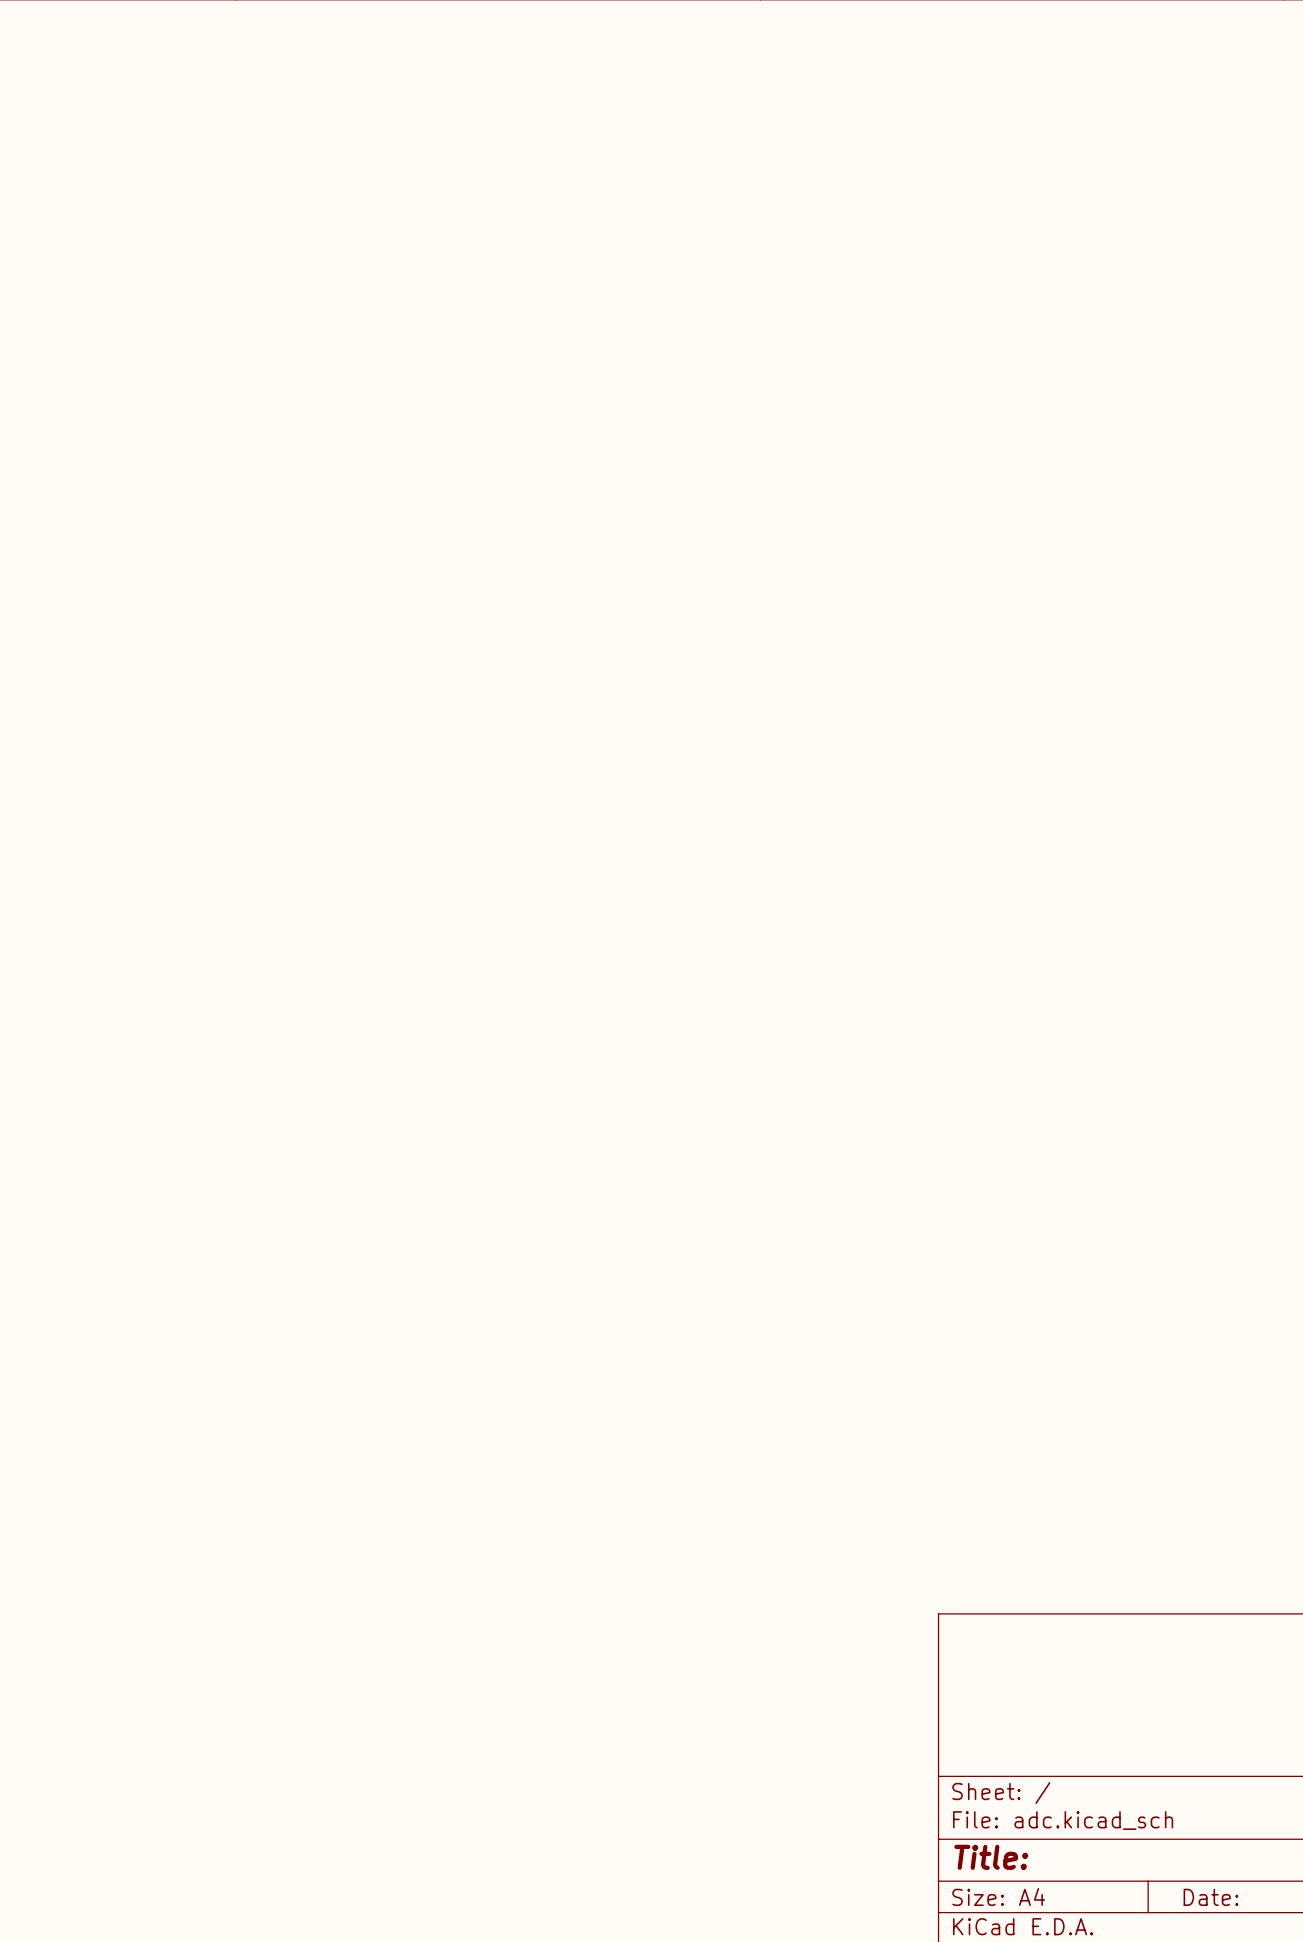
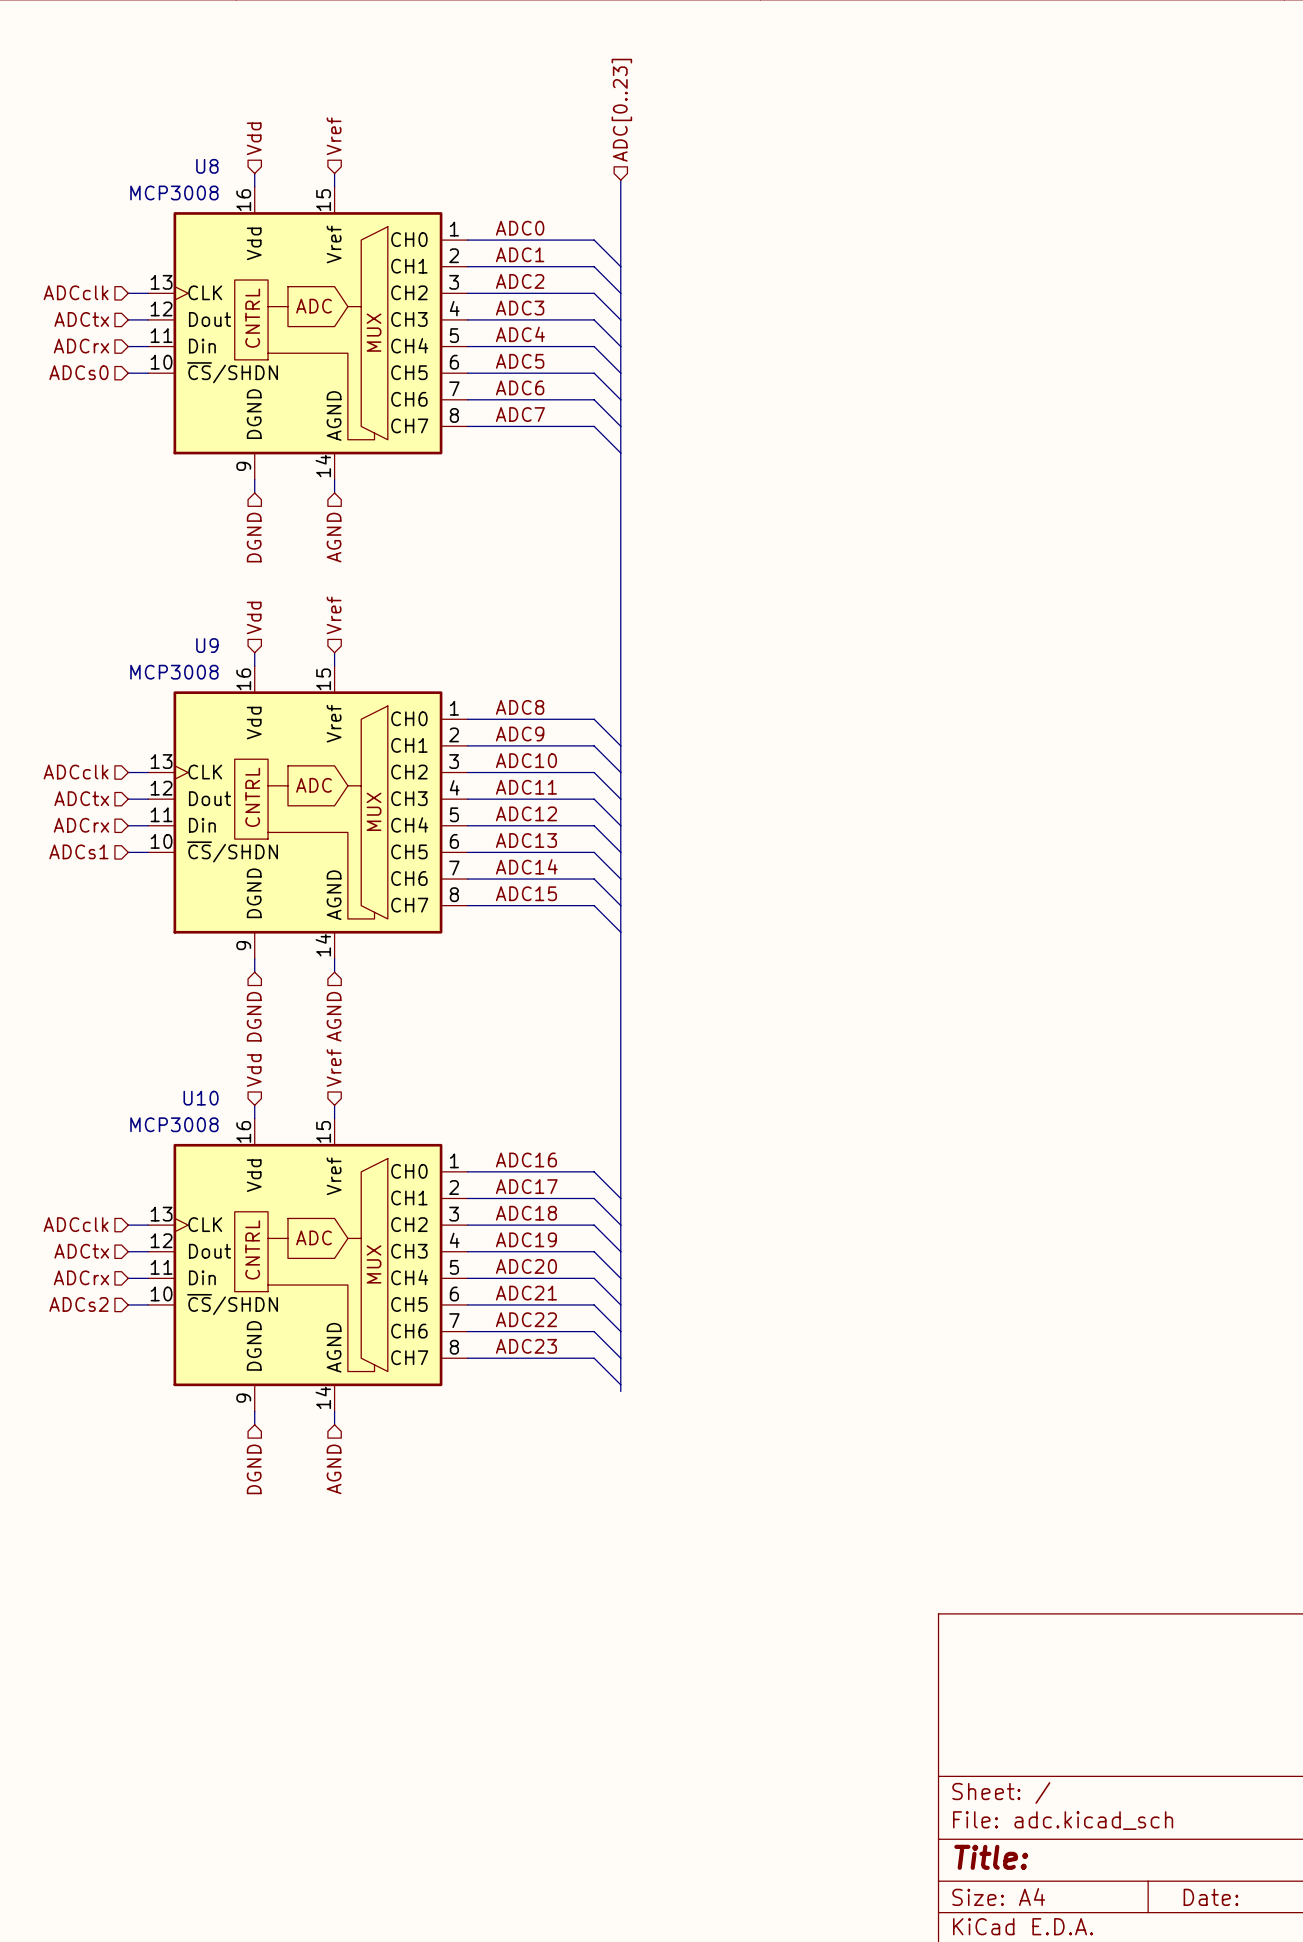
hierarchical label: none -> ADC[0..23] (621, 110)
hierarchical label: none -> Vref (334, 136)
hierarchical label: none -> Vdd (254, 138)
wire: none -> (254, 173) (254, 186)
wire: none -> (334, 173) (334, 186)
bus: none -> (620, 180) (620, 1391)
label: none -> ADC0 (520, 228)
wire: none -> (467, 240) (594, 240) (620, 266)
label: none -> ADC1 (520, 254)
wire: none -> (467, 266) (594, 266) (620, 293)
label: none -> ADC2 (520, 281)
hierarchical label: none -> ADCclk (76, 292)
wire: none -> (128, 293) (148, 293)
wire: none -> (467, 293) (594, 293) (620, 319)
label: none -> ADC3 (520, 308)
hierarchical label: none -> ADCtx (81, 319)
wire: none -> (128, 319) (148, 319)
wire: none -> (467, 319) (594, 319) (620, 346)
U8: none -> MCP3008 (307, 333)
label: none -> ADC4 (520, 334)
hierarchical label: none -> ADCrx (81, 346)
wire: none -> (128, 346) (148, 346)
wire: none -> (467, 346) (594, 346) (620, 373)
label: none -> ADC5 (520, 361)
hierarchical label: none -> ADCs0 (78, 372)
wire: none -> (128, 373) (148, 373)
wire: none -> (467, 373) (594, 373) (620, 399)
label: none -> ADC6 (520, 387)
wire: none -> (467, 399) (594, 399) (620, 426)
label: none -> ADC7 (520, 414)
wire: none -> (467, 426) (594, 426) (620, 453)
wire: none -> (254, 479) (254, 492)
wire: none -> (334, 479) (334, 492)
hierarchical label: none -> DGND (254, 537)
hierarchical label: none -> AGND (334, 537)
hierarchical label: none -> Vref (334, 615)
hierarchical label: none -> Vdd (254, 617)
wire: none -> (254, 652) (254, 666)
wire: none -> (334, 652) (334, 666)
label: none -> ADC8 (520, 707)
wire: none -> (467, 719) (594, 719) (620, 745)
label: none -> ADC9 (520, 734)
wire: none -> (467, 745) (594, 745) (620, 772)
label: none -> ADC10 (526, 760)
hierarchical label: none -> ADCclk (76, 772)
wire: none -> (128, 772) (148, 772)
wire: none -> (467, 772) (594, 772) (620, 799)
label: none -> ADC11 (526, 787)
hierarchical label: none -> ADCtx (81, 798)
wire: none -> (128, 799) (148, 799)
wire: none -> (467, 799) (594, 799) (620, 825)
U9: none -> MCP3008 (307, 812)
label: none -> ADC12 (526, 813)
hierarchical label: none -> ADCrx (81, 825)
wire: none -> (128, 825) (148, 825)
wire: none -> (467, 825) (594, 825) (620, 852)
label: none -> ADC13 (526, 840)
hierarchical label: none -> ADCs1 (78, 851)
wire: none -> (128, 852) (148, 852)
wire: none -> (467, 852) (594, 852) (620, 879)
label: none -> ADC14 (526, 866)
wire: none -> (467, 879) (594, 879) (620, 905)
label: none -> ADC15 (526, 893)
wire: none -> (467, 905) (594, 905) (620, 932)
wire: none -> (254, 958) (254, 972)
wire: none -> (334, 958) (334, 972)
hierarchical label: none -> DGND (254, 1016)
hierarchical label: none -> AGND (334, 1016)
hierarchical label: none -> Vref (334, 1068)
hierarchical label: none -> Vdd (254, 1070)
wire: none -> (254, 1105) (254, 1118)
wire: none -> (334, 1105) (334, 1118)
label: none -> ADC16 (526, 1159)
wire: none -> (467, 1171) (594, 1171) (620, 1198)
label: none -> ADC17 (526, 1186)
wire: none -> (467, 1198) (594, 1198) (620, 1225)
label: none -> ADC18 (526, 1213)
hierarchical label: none -> ADCclk (76, 1224)
wire: none -> (128, 1225) (148, 1225)
wire: none -> (467, 1225) (594, 1225) (620, 1251)
label: none -> ADC19 (526, 1239)
hierarchical label: none -> ADCtx (81, 1251)
wire: none -> (128, 1251) (148, 1251)
wire: none -> (467, 1251) (594, 1251) (620, 1278)
U10: none -> MCP3008 (307, 1265)
label: none -> ADC20 (526, 1266)
hierarchical label: none -> ADCrx (81, 1277)
wire: none -> (128, 1278) (148, 1278)
wire: none -> (467, 1278) (594, 1278) (620, 1304)
label: none -> ADC21 (526, 1293)
hierarchical label: none -> ADCs2 (78, 1304)
wire: none -> (128, 1304) (148, 1304)
wire: none -> (467, 1304) (594, 1304) (620, 1331)
label: none -> ADC22 (526, 1319)
wire: none -> (467, 1331) (594, 1331) (620, 1358)
label: none -> ADC23 (526, 1346)
wire: none -> (467, 1358) (594, 1358) (620, 1384)
wire: none -> (254, 1411) (254, 1424)
wire: none -> (334, 1411) (334, 1424)
hierarchical label: none -> DGND (254, 1469)
hierarchical label: none -> AGND (334, 1469)

